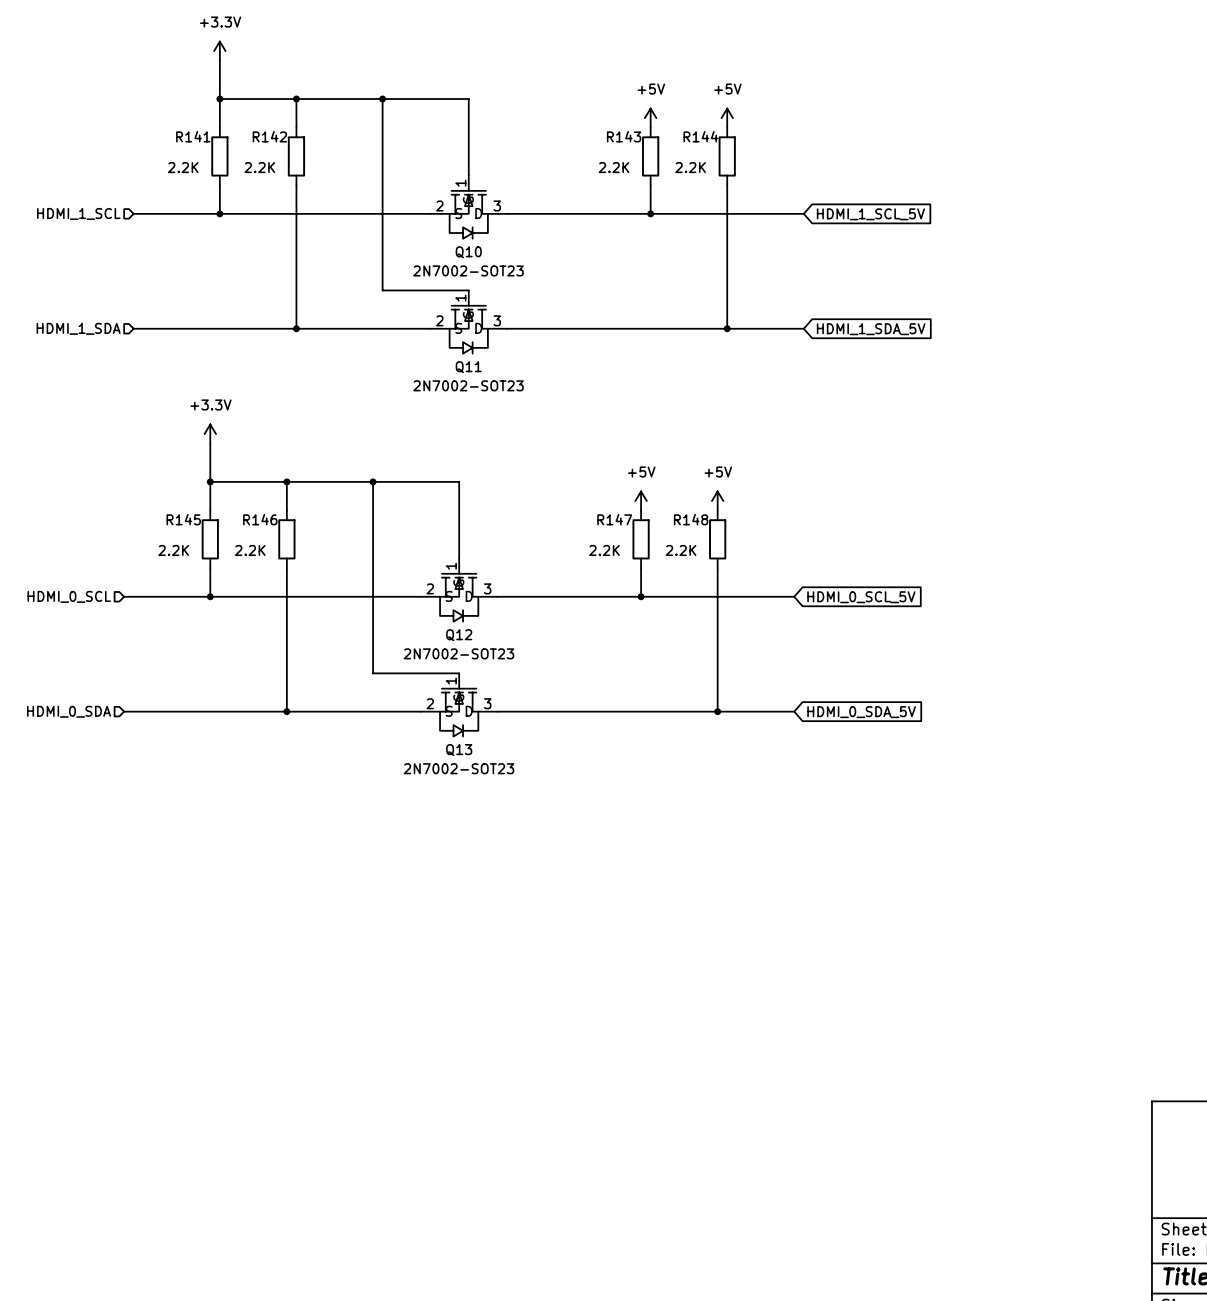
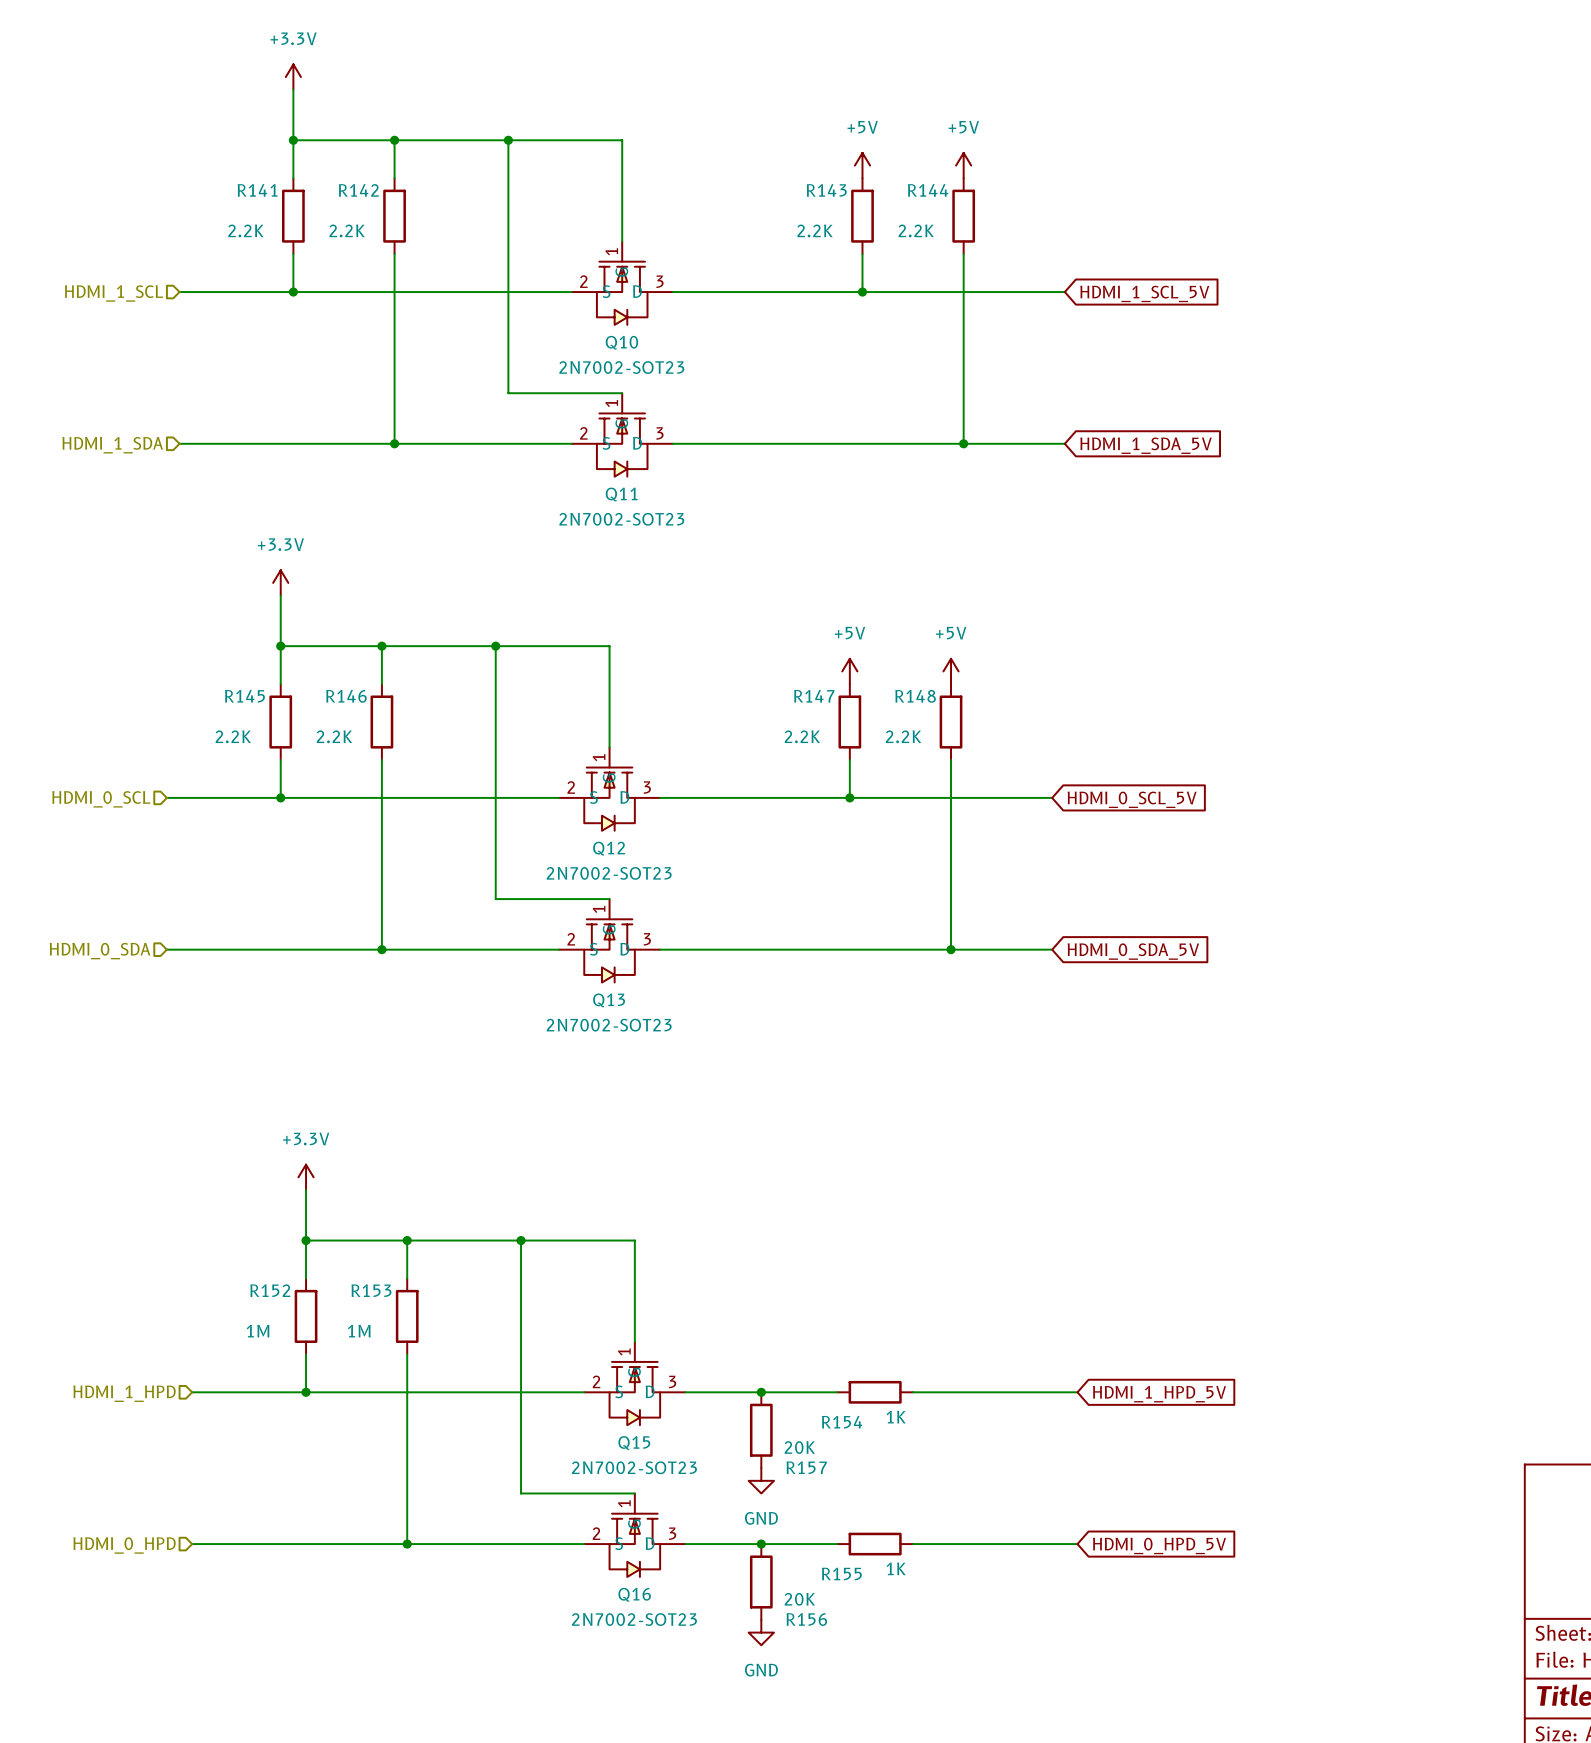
power symbol: none -> +3.3V (306, 1177)
wire: none -> (306, 1189) (306, 1278)
wire: none -> (306, 1240) (634, 1240) (634, 1341)
junction: none -> (306, 1240)
wire: none -> (407, 1240) (407, 1278)
junction: none -> (407, 1240)
wire: none -> (521, 1240) (521, 1493) (634, 1493)
junction: none -> (521, 1240)
R152: none -> 1M (306, 1316)
R153: none -> 1M (407, 1316)
wire: none -> (306, 1354) (306, 1392)
wire: none -> (407, 1354) (407, 1544)
Q15: none -> 2N7002-SOT23 (634, 1383)
hierarchical label: none -> HDMI_1_HPD (124, 1393)
wire: none -> (192, 1392) (584, 1392)
junction: none -> (306, 1392)
wire: none -> (685, 1392) (837, 1392)
junction: none -> (761, 1392)
R154: none -> 1K (875, 1392)
wire: none -> (913, 1392) (1077, 1392)
global label: none -> HDMI_1_HPD_5V (1159, 1394)
R157: none -> 20K (761, 1430)
power symbol: none -> GND (761, 1480)
Q16: none -> 2N7002-SOT23 (634, 1535)
hierarchical label: none -> HDMI_0_HPD (124, 1545)
wire: none -> (192, 1544) (584, 1544)
junction: none -> (407, 1544)
wire: none -> (685, 1544) (837, 1544)
junction: none -> (761, 1544)
R155: none -> 1K (875, 1544)
wire: none -> (913, 1544) (1077, 1544)
global label: none -> HDMI_0_HPD_5V (1159, 1545)
R156: none -> 20K (761, 1582)
power symbol: none -> GND (761, 1632)

